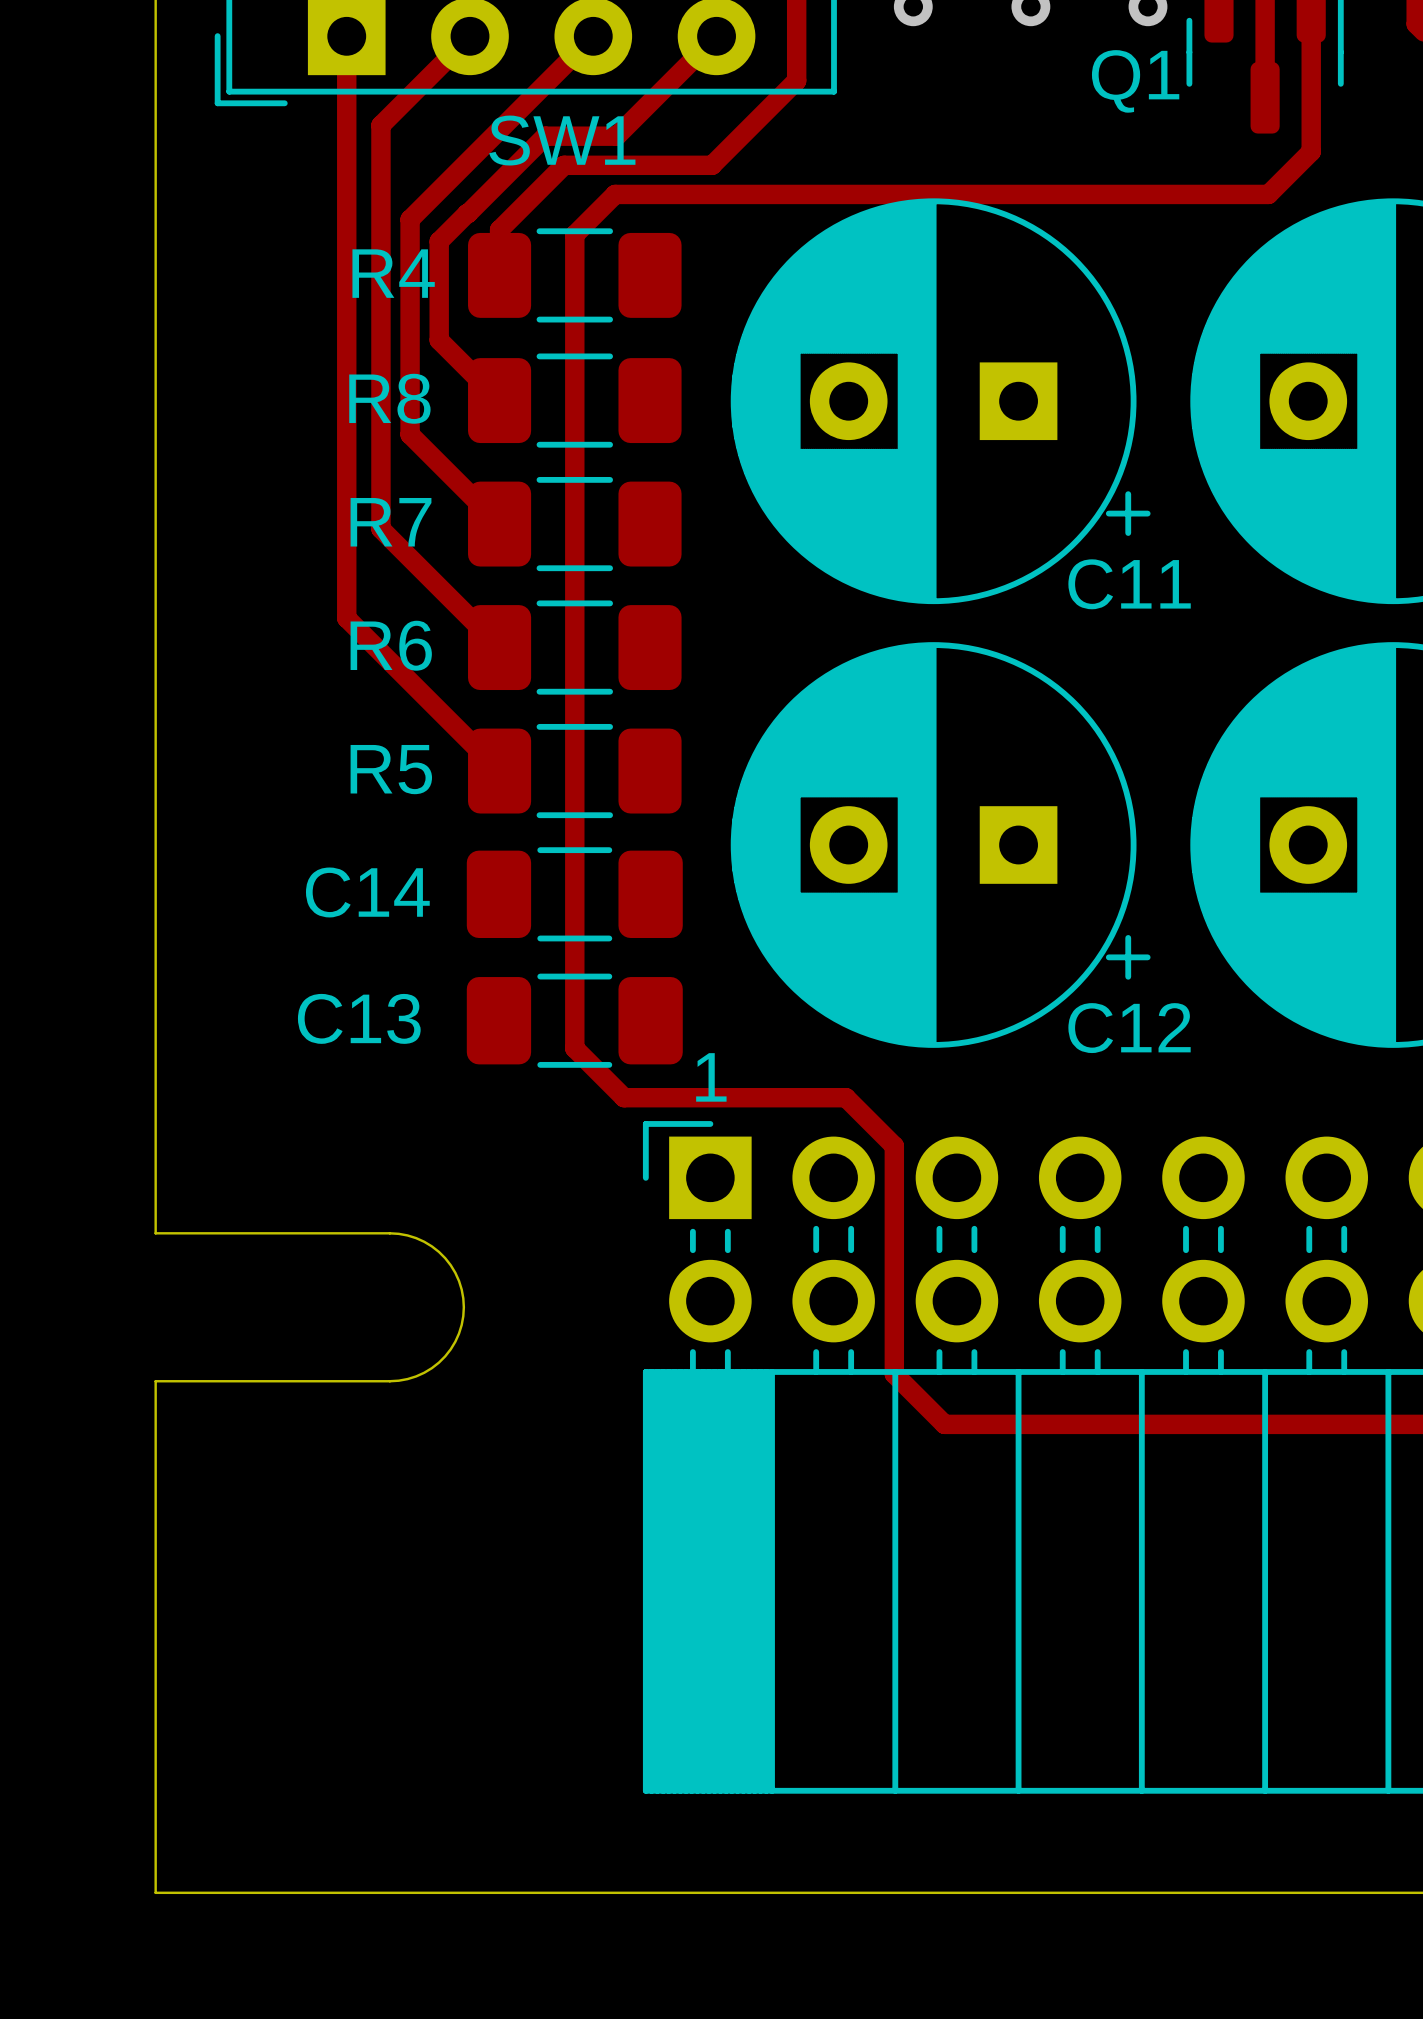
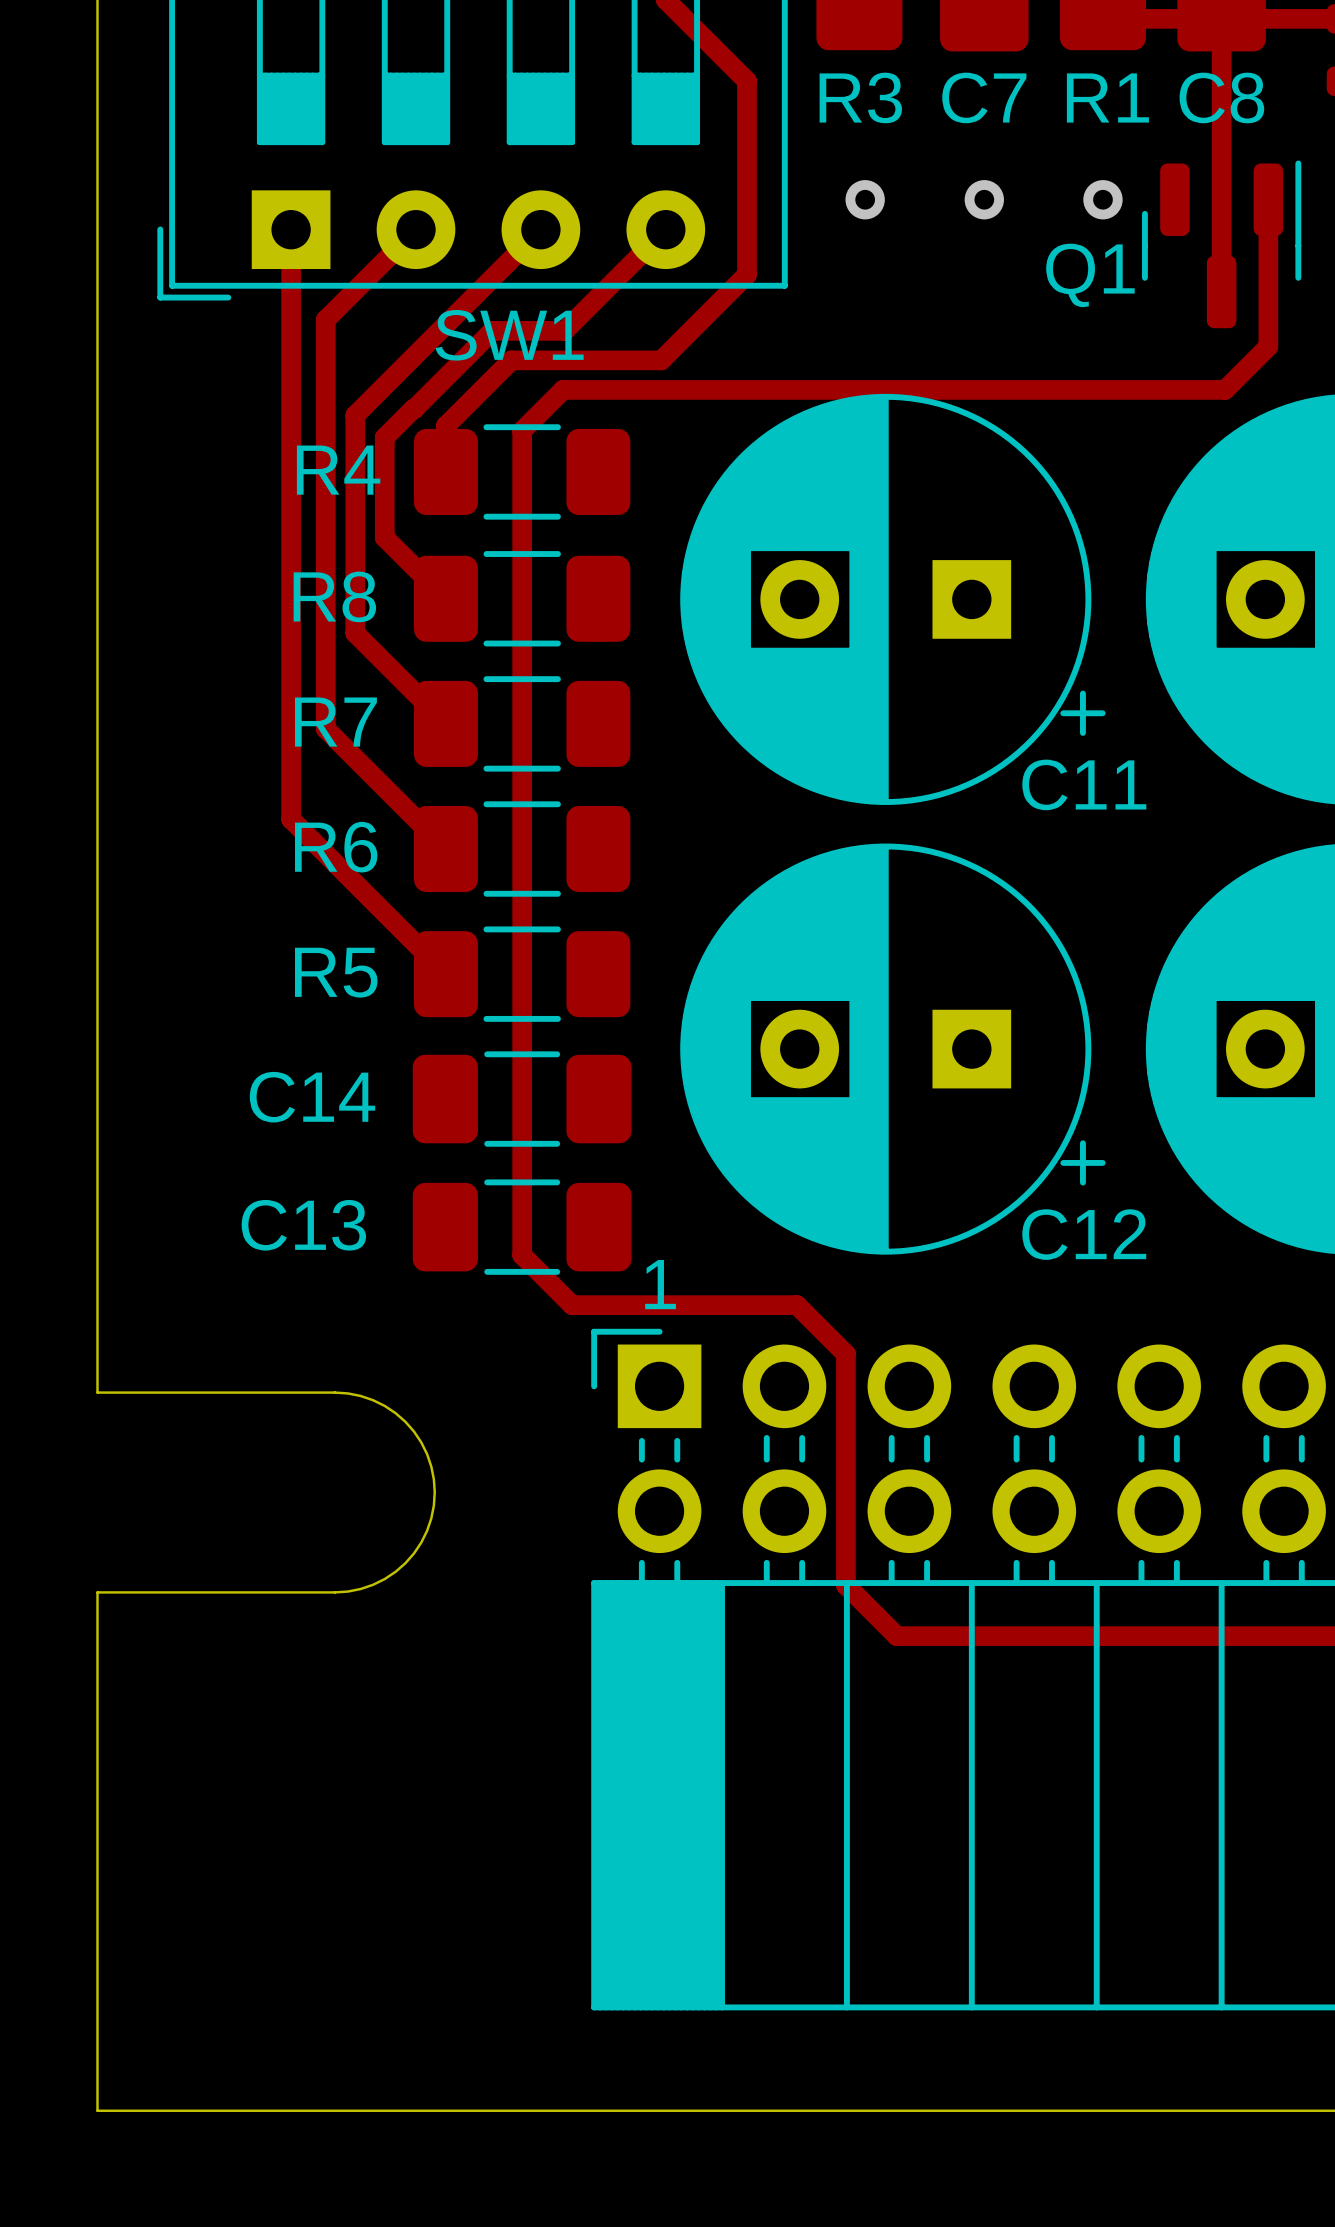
board edge: (155, 1184) (155, 1233) (398, 1233) (424, 1241) (438, 1251) (455, 1272) (461, 1289) (463, 1307) (459, 1333) (445, 1356) (431, 1368) (407, 1379) (389, 1381) -> (97, 1392) (347, 1393) (373, 1400) (395, 1413) (414, 1431) (427, 1454) (431, 1466) (434, 1492) (431, 1518) (427, 1530) (414, 1553) (395, 1571) (373, 1584) (360, 1589) (334, 1592)

